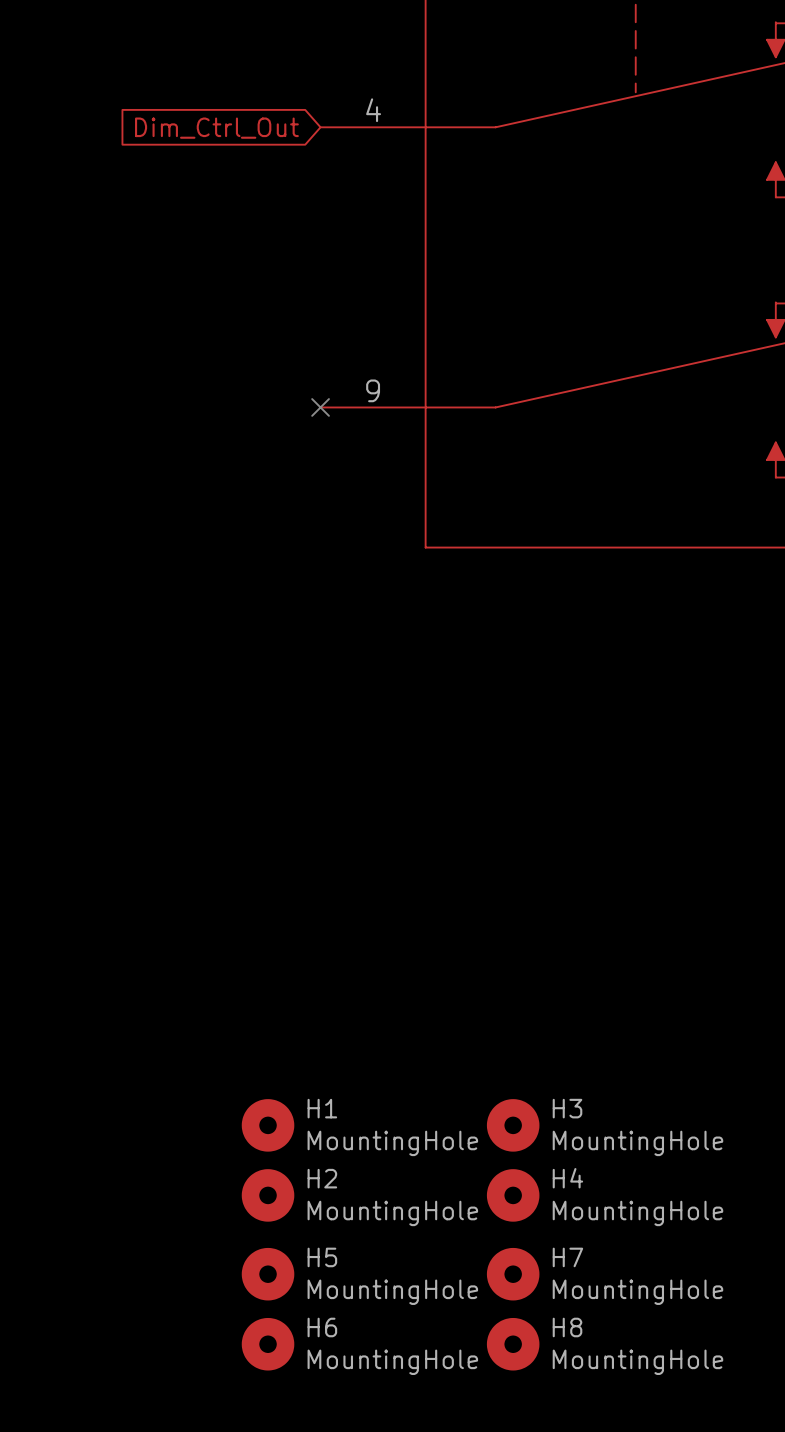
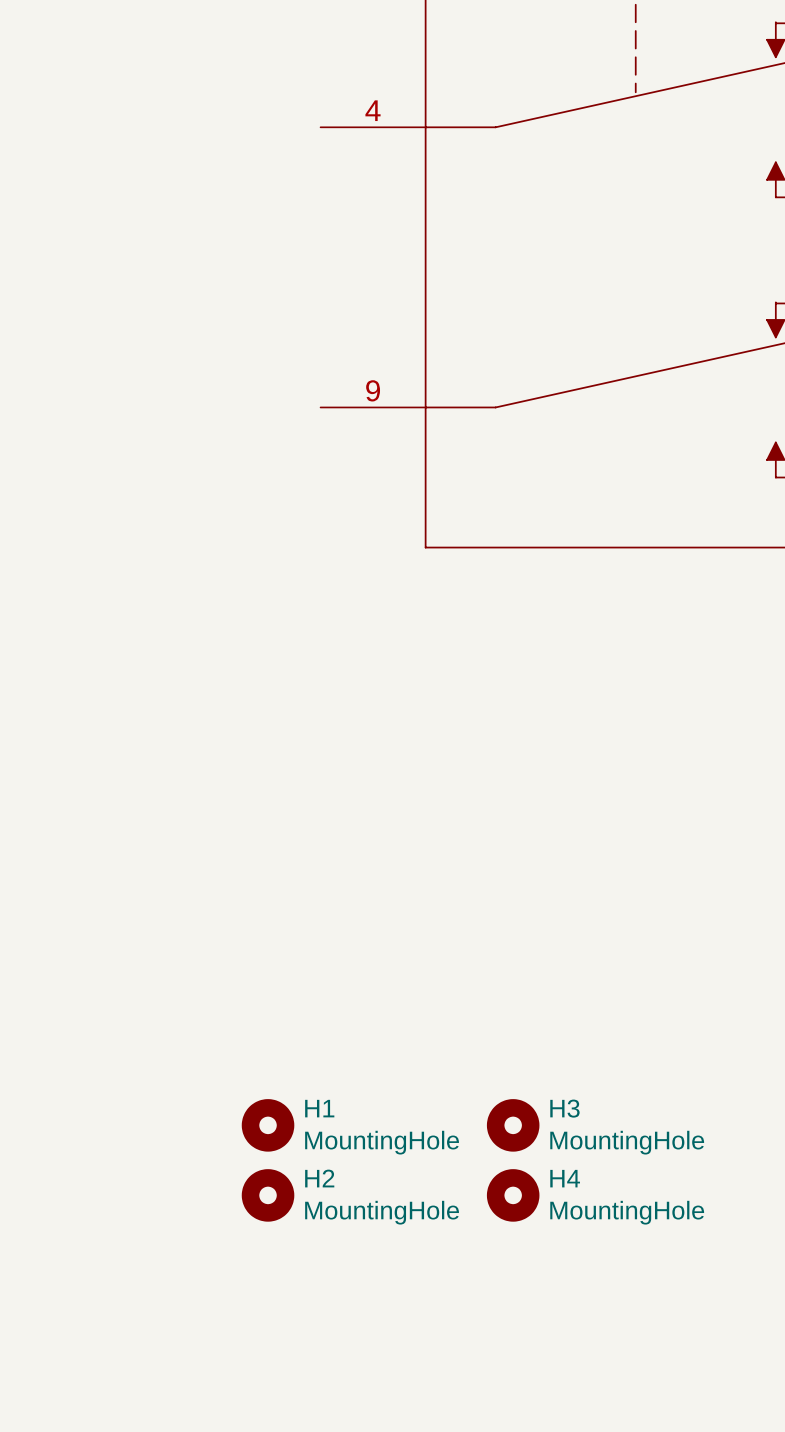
global label: Dim_Ctrl_Out (216, 128) -> none
no-connect mark: (320, 407) -> none
H5: MountingHole (268, 1274) -> none
H7: MountingHole (513, 1274) -> none
H6: MountingHole (268, 1344) -> none
H8: MountingHole (513, 1344) -> none

